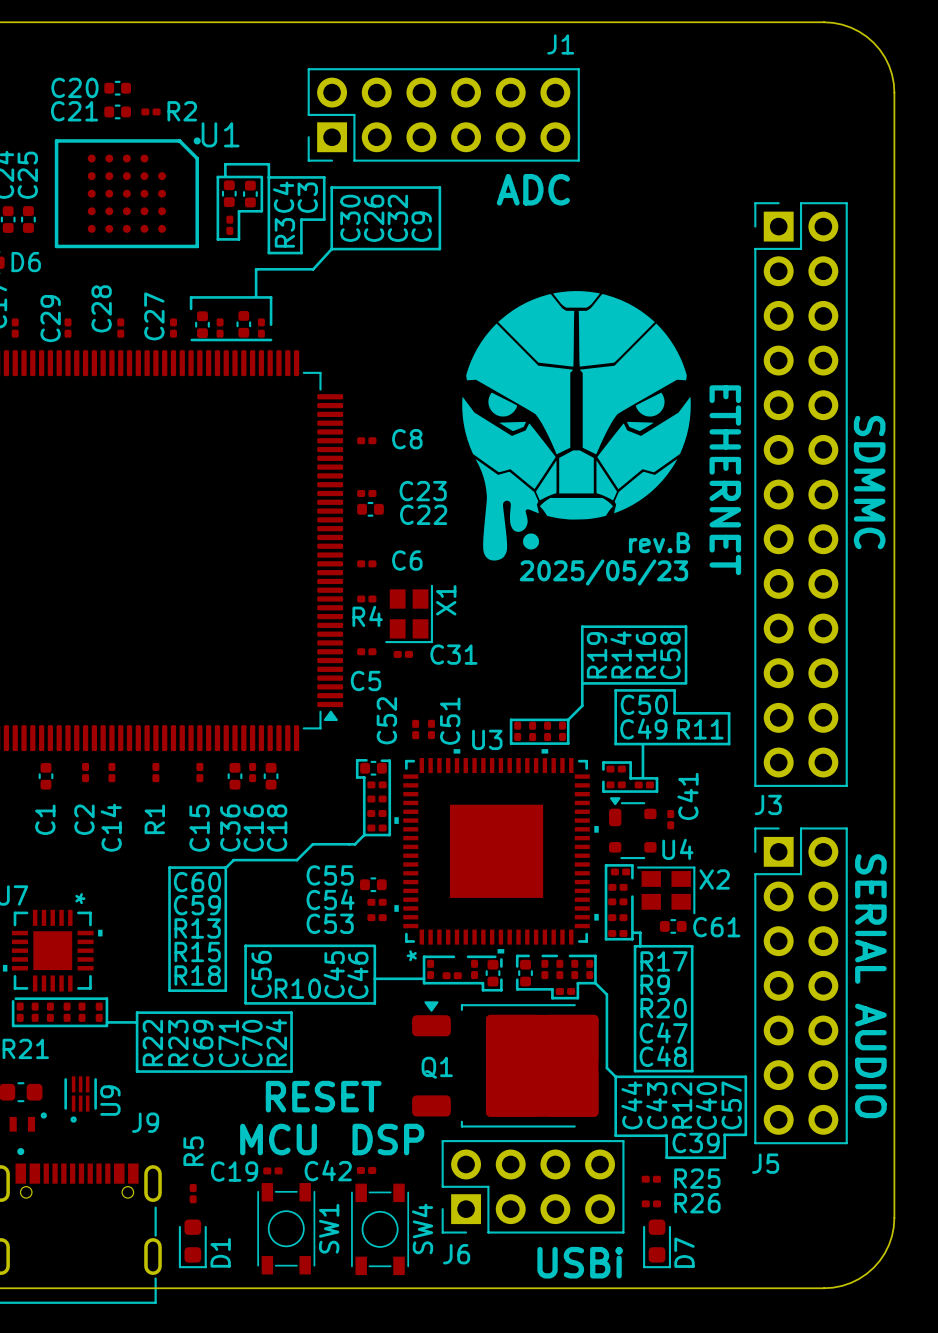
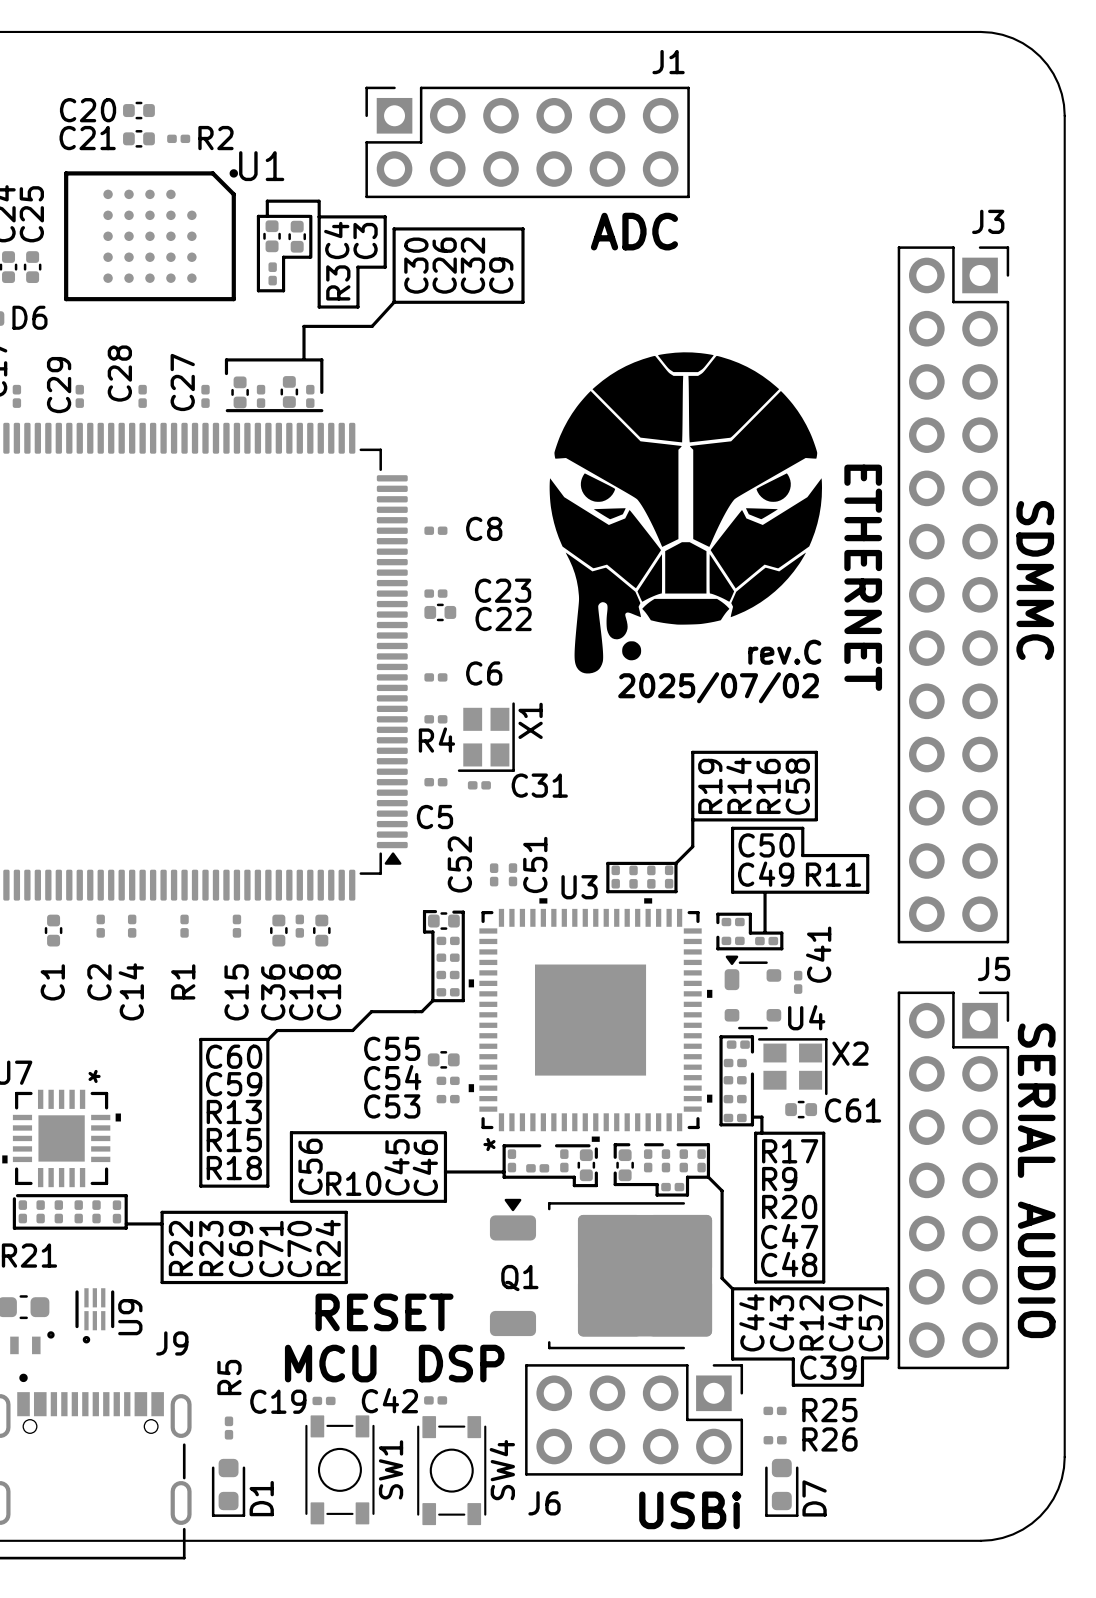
J1 footprint: [307, 68, 580, 162] -> [365, 86, 690, 199]
J3 footprint: [754, 202, 848, 787] -> [897, 246, 1010, 944]
text: rev.B (659, 542) -> rev.C (784, 652)
text: 2025/05/23 (603, 572) -> 2025/07/02 (718, 687)
J3 name position: J3 (768, 804) -> J3 (988, 221)
J5 footprint: [754, 827, 848, 1145] -> [897, 991, 1010, 1370]
J5 name position: J5 (765, 1163) -> J5 (994, 968)
J6 rotation: 0° (533, 1186) -> 180° (634, 1419)

